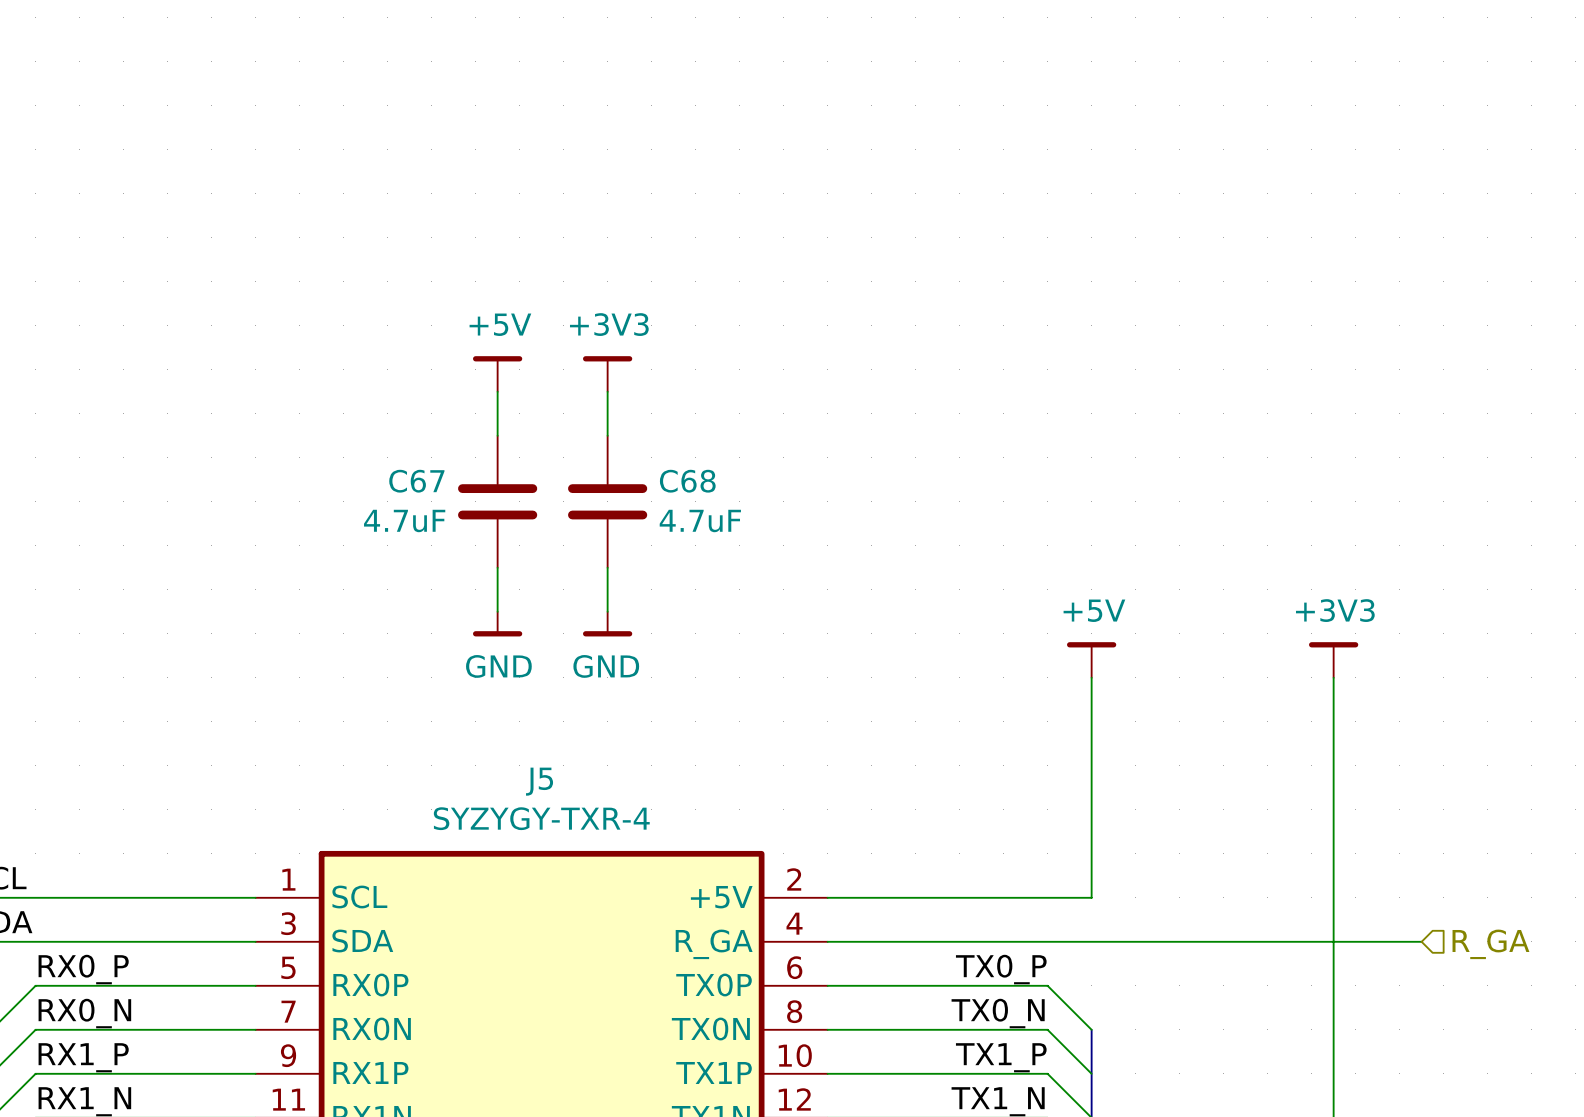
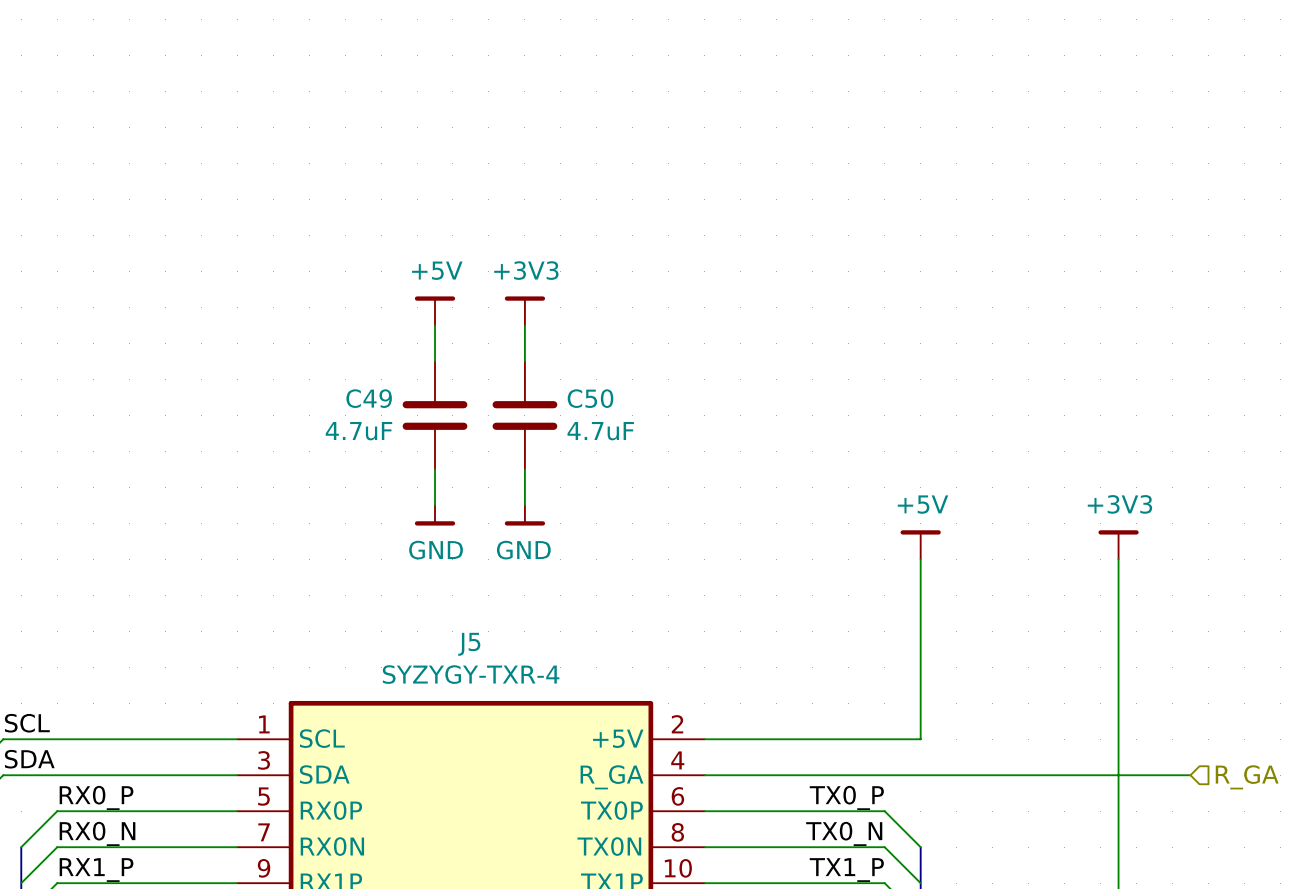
C67 name: C67 (416, 481) -> C49 (369, 398)
C68 name: C68 (687, 481) -> C50 (590, 398)

